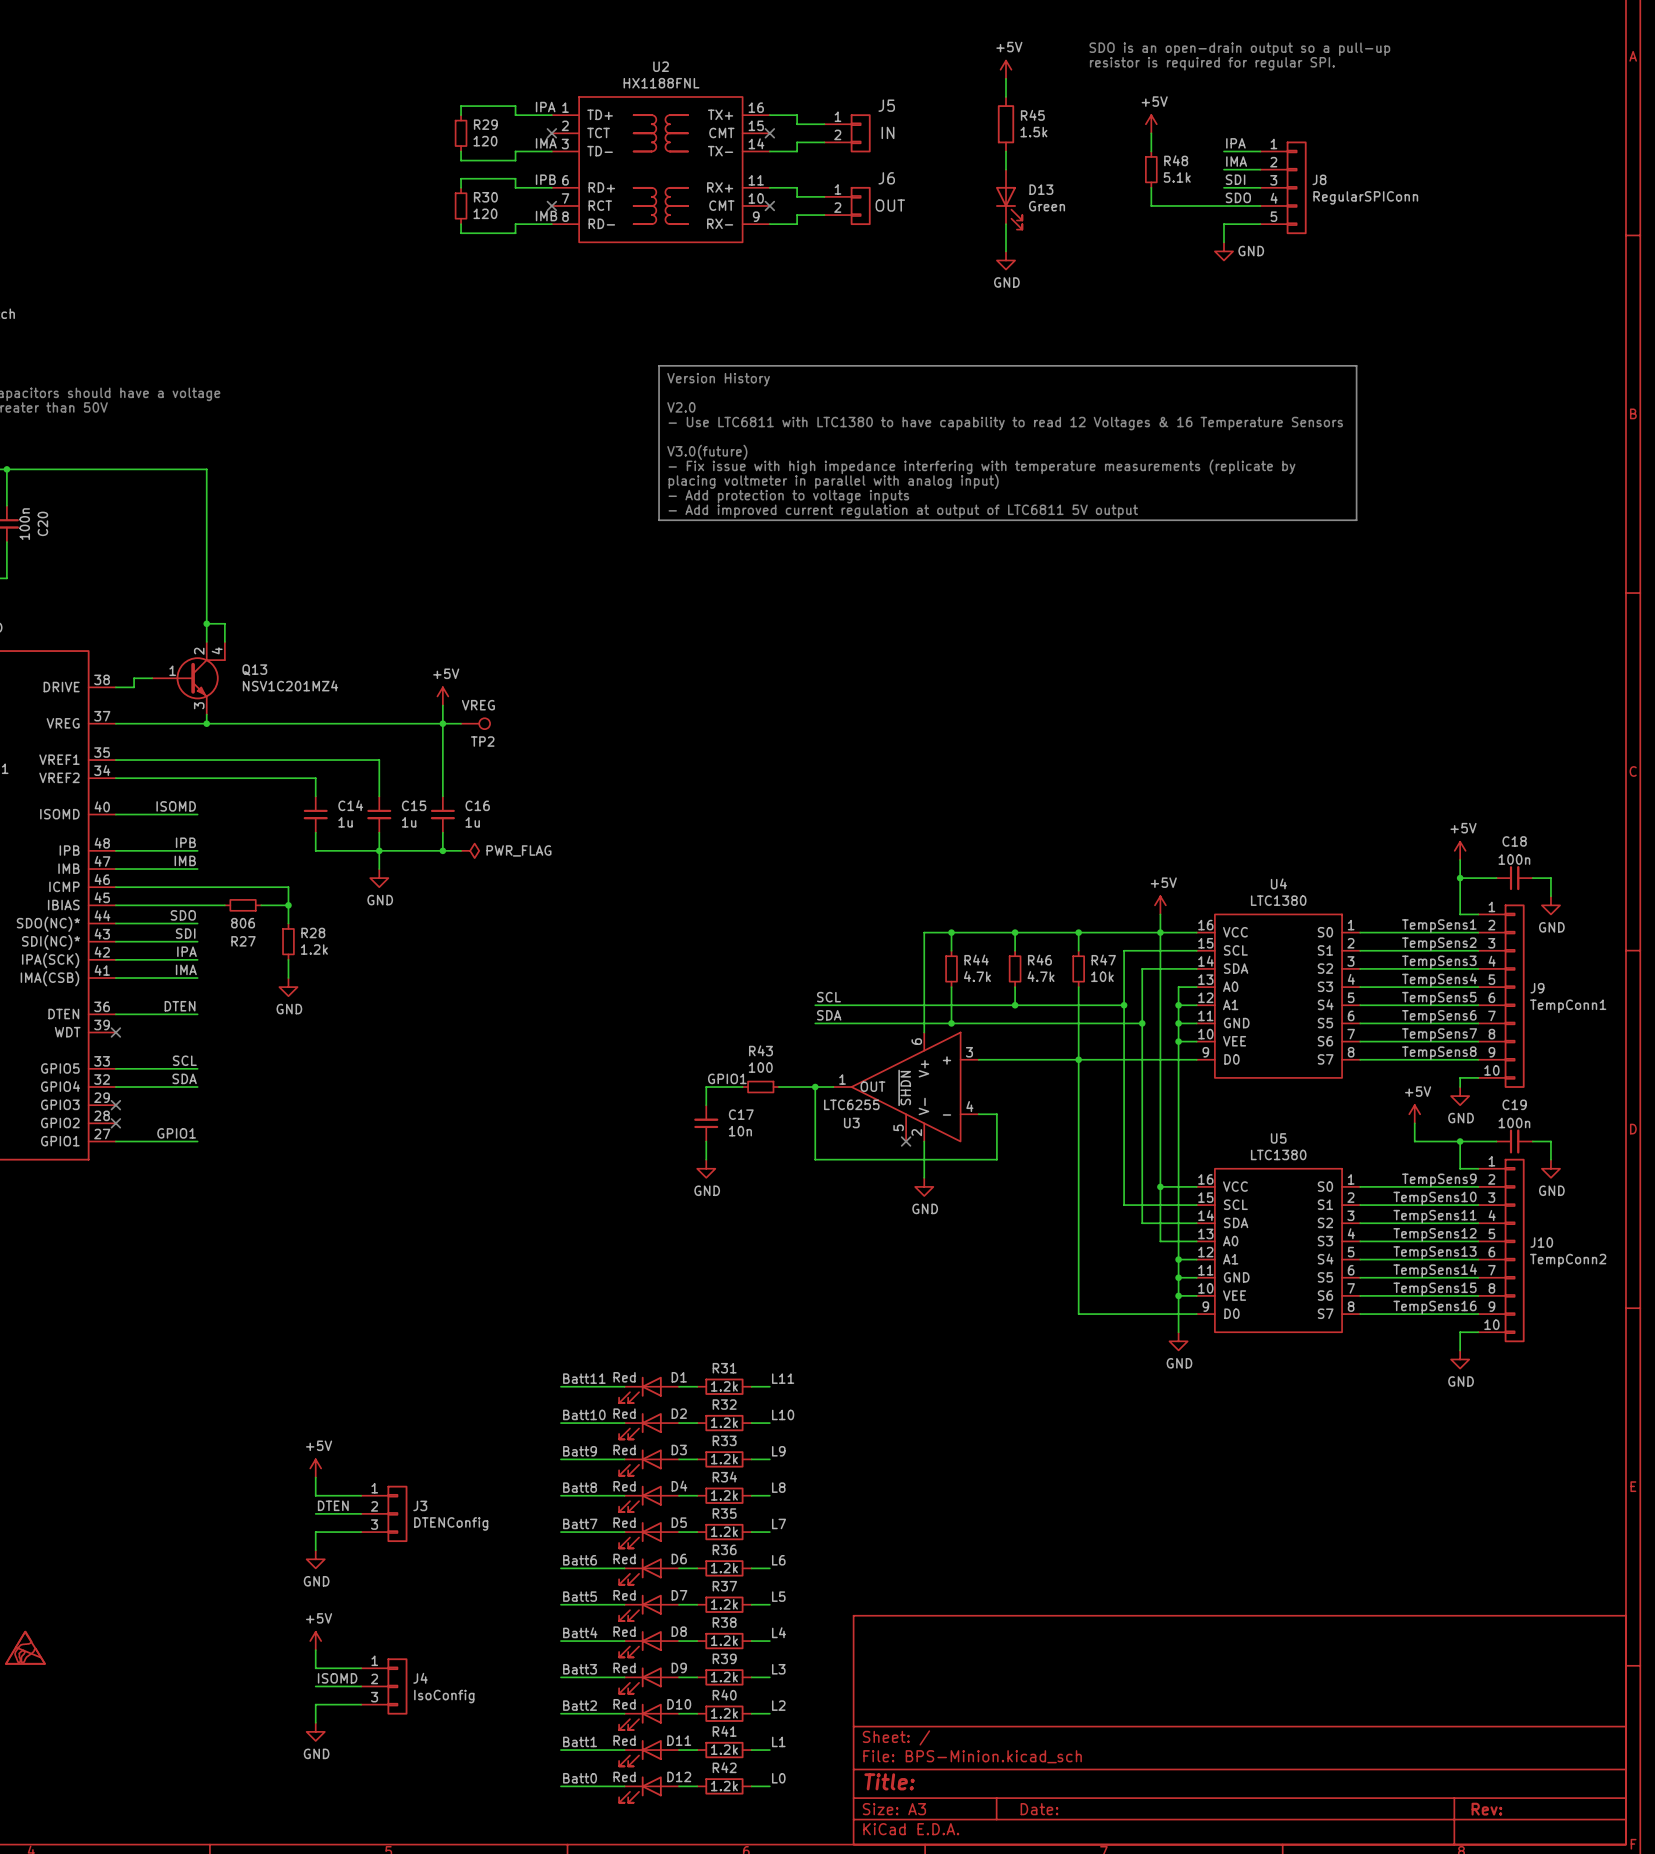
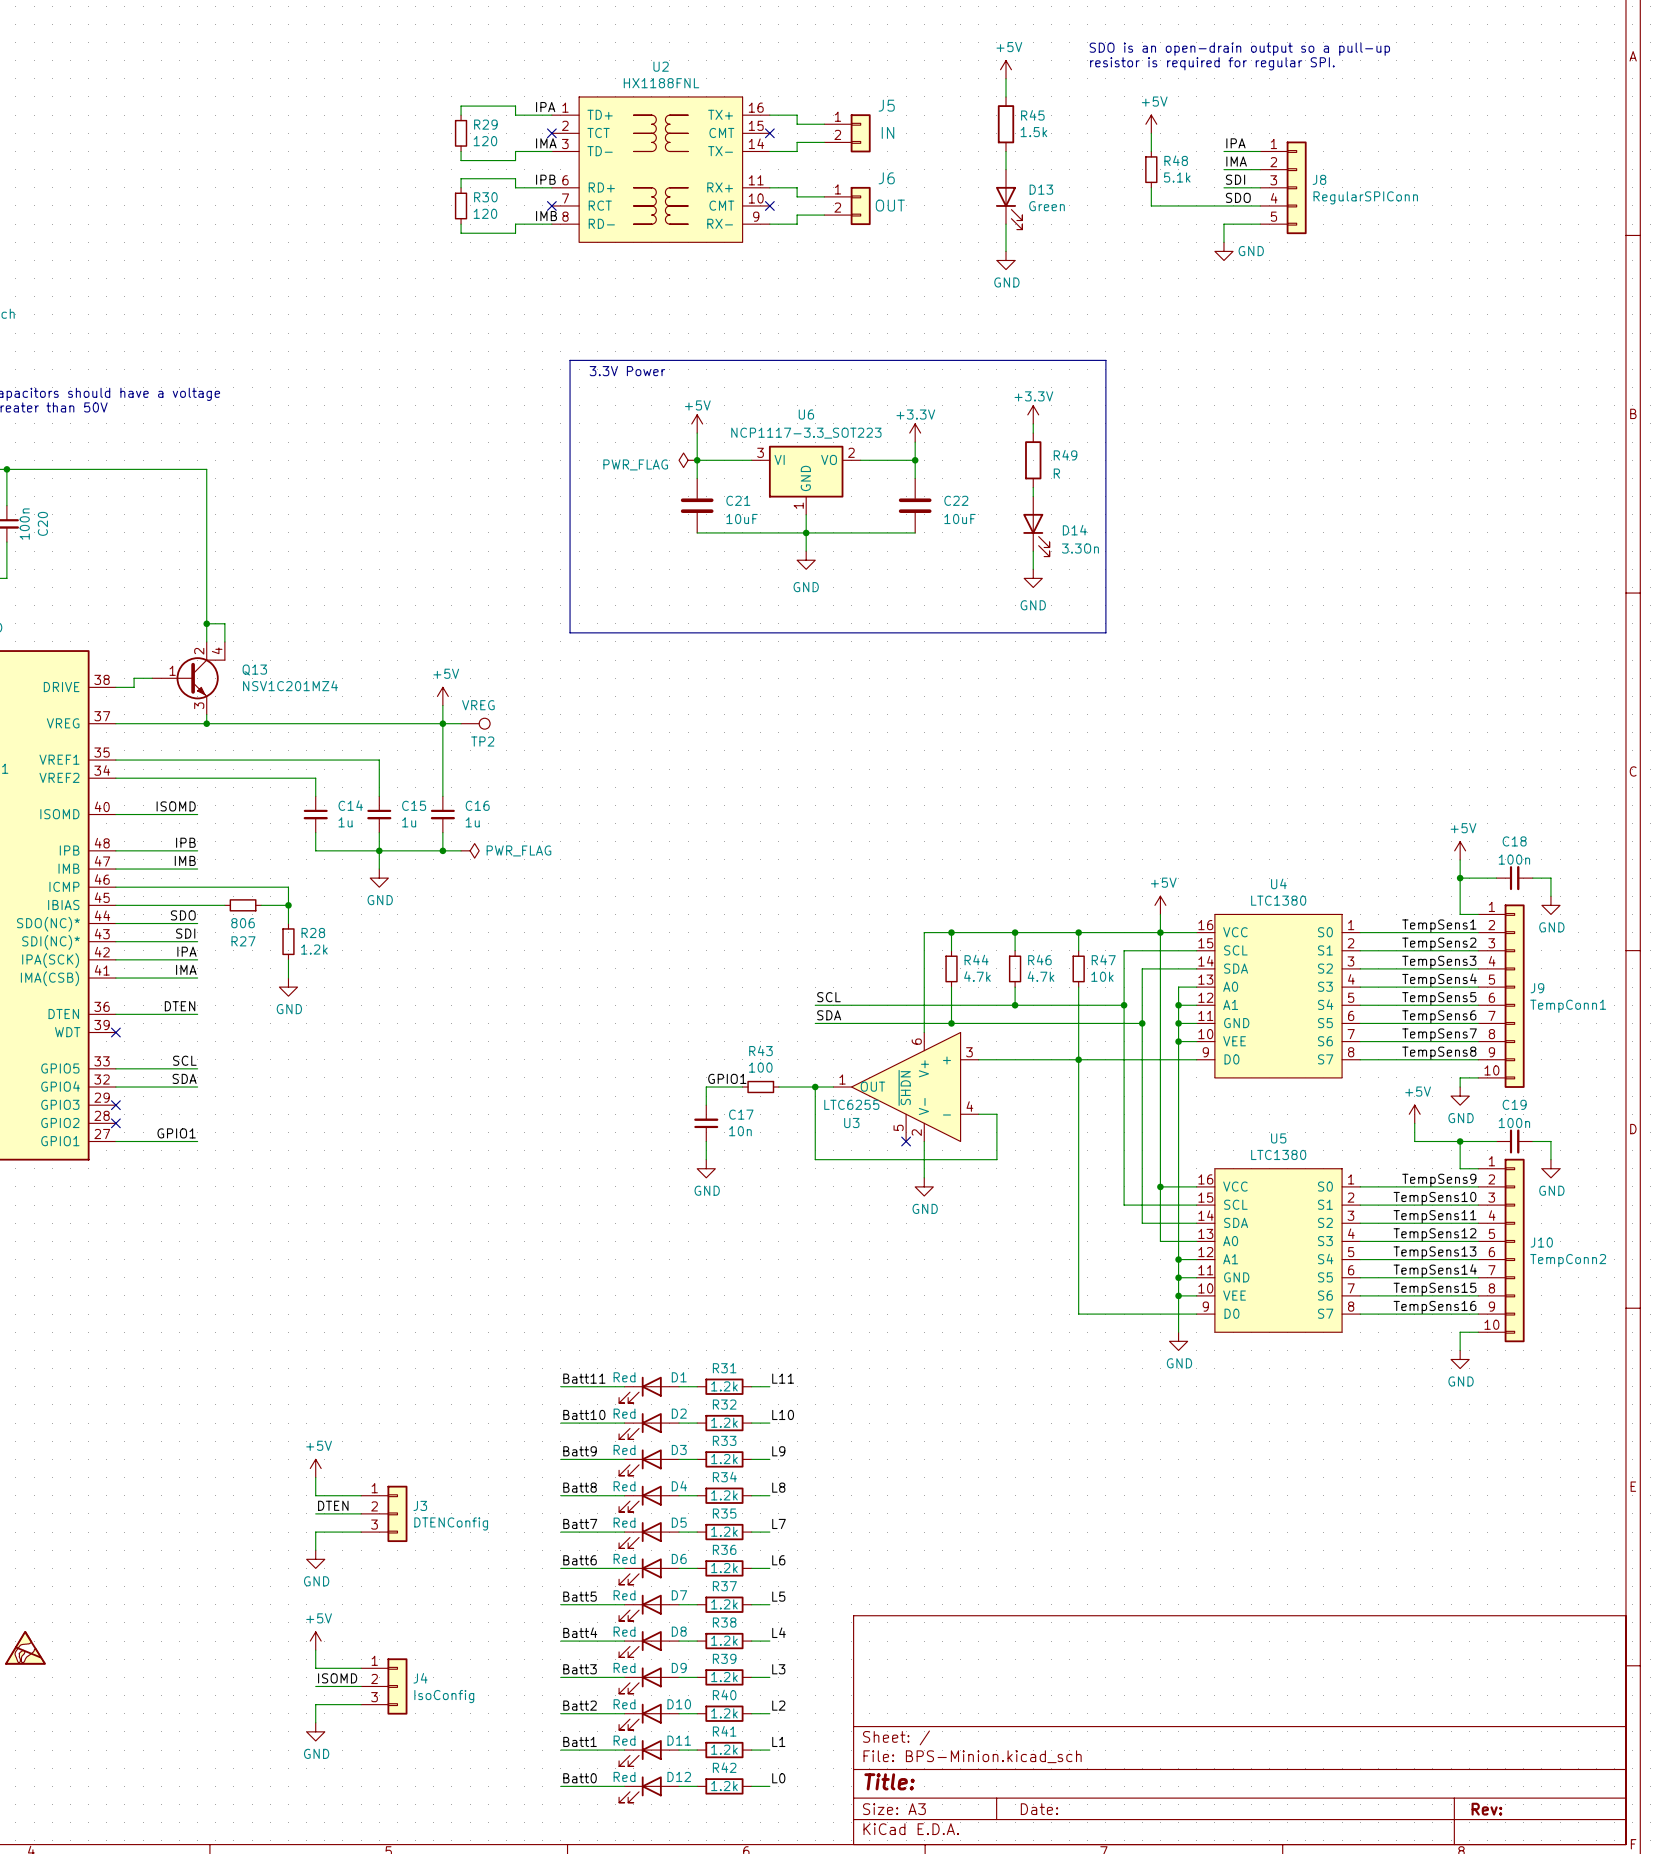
line: none -> (570, 360) (1105, 360) (1105, 632) (570, 632) (570, 360)
line: (659, 365) (1356, 365) (1356, 520) (659, 520) (659, 365) -> none
text: none -> 3.3V Power (627, 371)
text: Version History (718, 379) -> none
text: V2.0 (681, 407) -> none
power symbol: none -> +3.3V (1033, 414)
power symbol: none -> +5V (697, 423)
text: - Use LTC6811 with LTC1380 to have capability to read 12 Voltages & 16 Temperature Sensors (1005, 423) -> none
wire: none -> (1033, 423) (1033, 433)
wire: none -> (697, 433) (697, 478)
power symbol: none -> +3.3V (915, 433)
wire: none -> (915, 442) (915, 478)
text: V3.0(future) (707, 452) -> none
power symbol: none -> PWR_FLAG (688, 460)
wire: none -> (697, 460) (751, 460)
junction: none -> (697, 460)
wire: none -> (860, 460) (915, 460)
junction: none -> (915, 460)
R49: none -> R (1033, 460)
text: - Fix issue with high impedance interfering with temperature measurements (replicate by (981, 466) -> none
U6: none -> NCP1117-3.3_SOT223 (806, 480)
text: placing voltmeter in parallel with analog input) (833, 481) -> none
wire: none -> (1033, 487) (1033, 496)
text: - Add protection to voltage inputs (788, 496) -> none
C21: none -> 10uF (697, 505)
C22: none -> 10uF (915, 505)
text: - Add improved current regulation at output of LTC6811 5V output (903, 511) -> none
wire: none -> (806, 514) (806, 551)
D14: none -> 3.3On (1036, 526)
wire: none -> (697, 532) (915, 532)
junction: none -> (806, 532)
wire: none -> (1033, 551) (1033, 569)
power symbol: none -> GND (806, 560)
power symbol: none -> GND (1033, 578)

